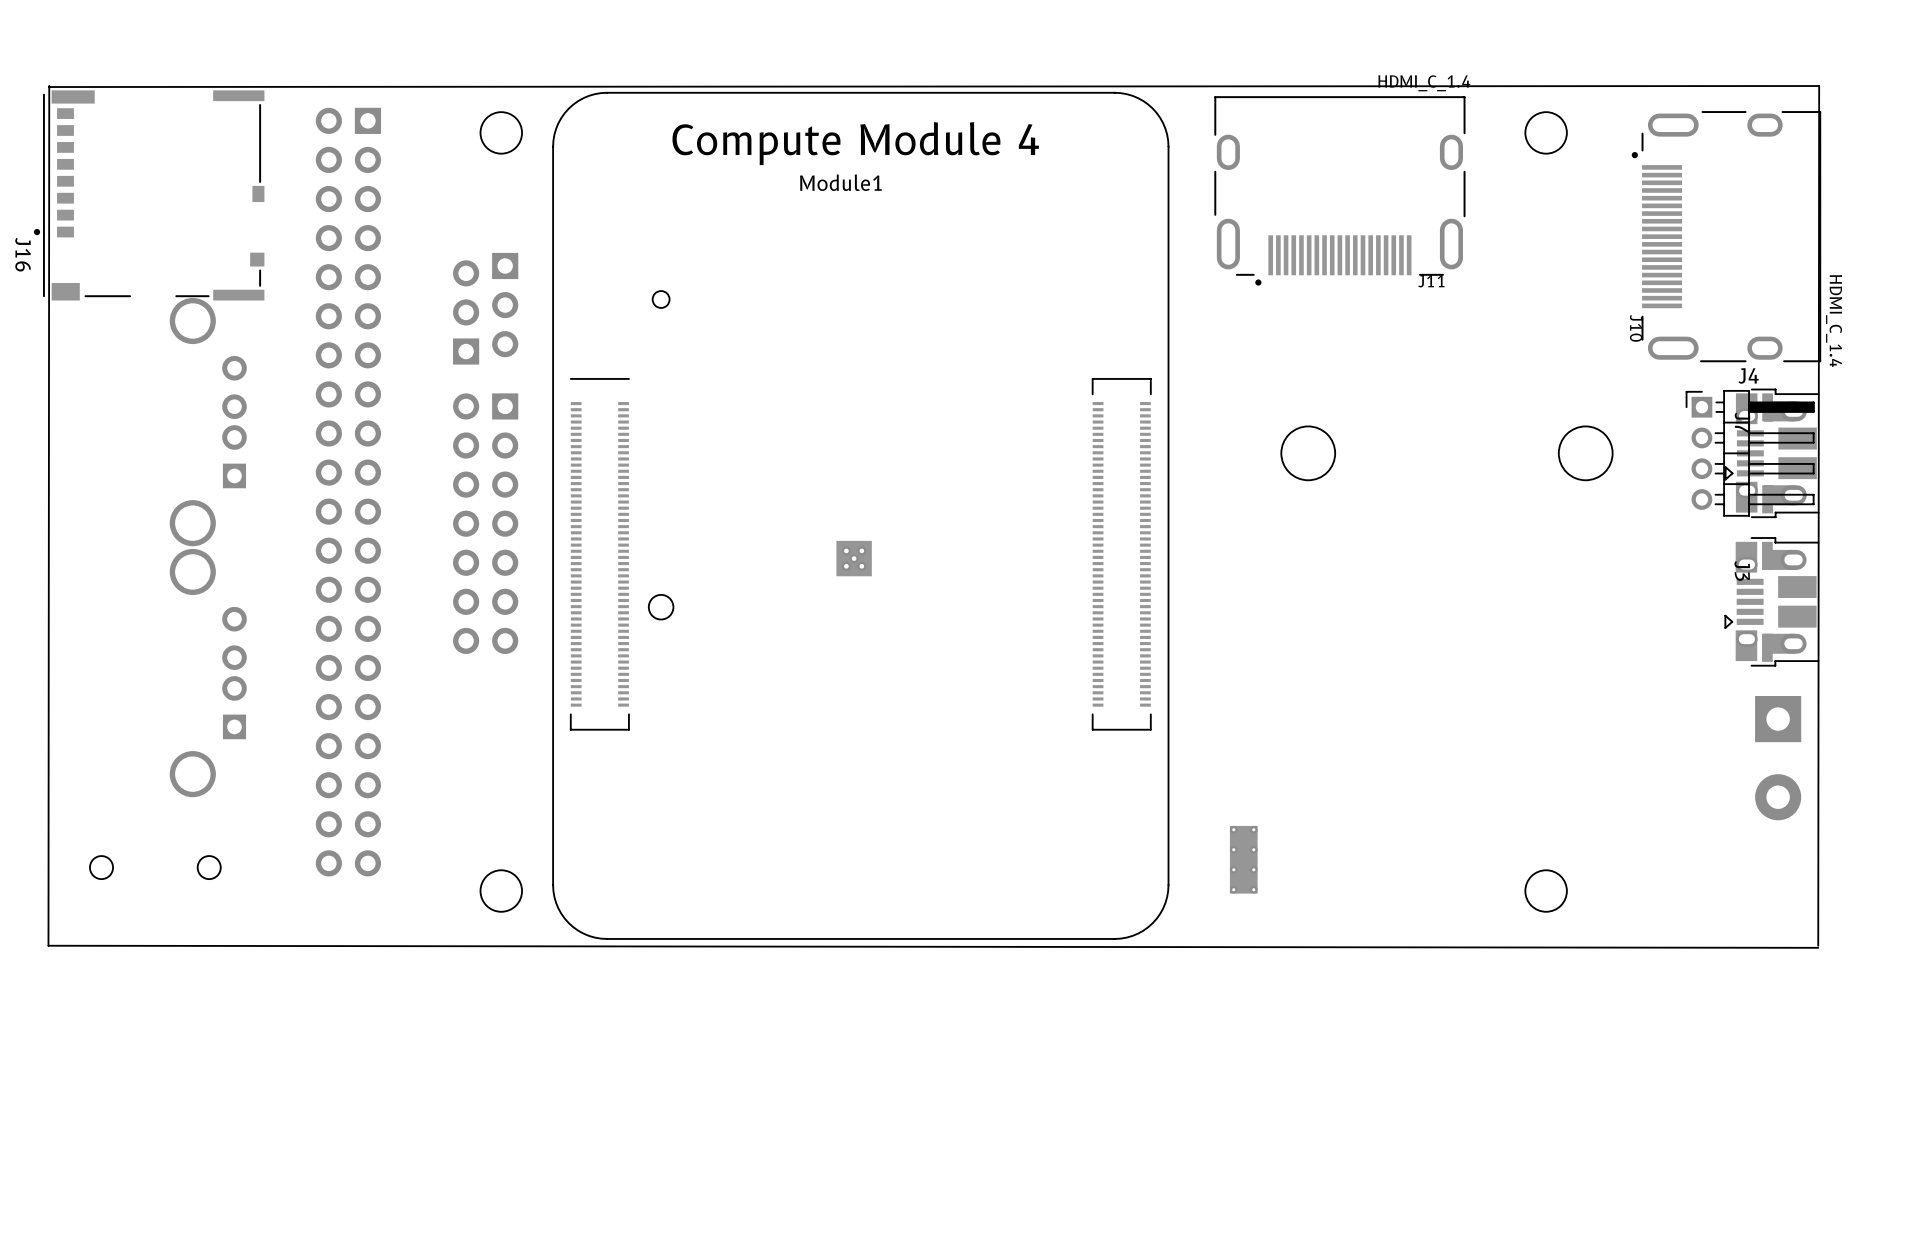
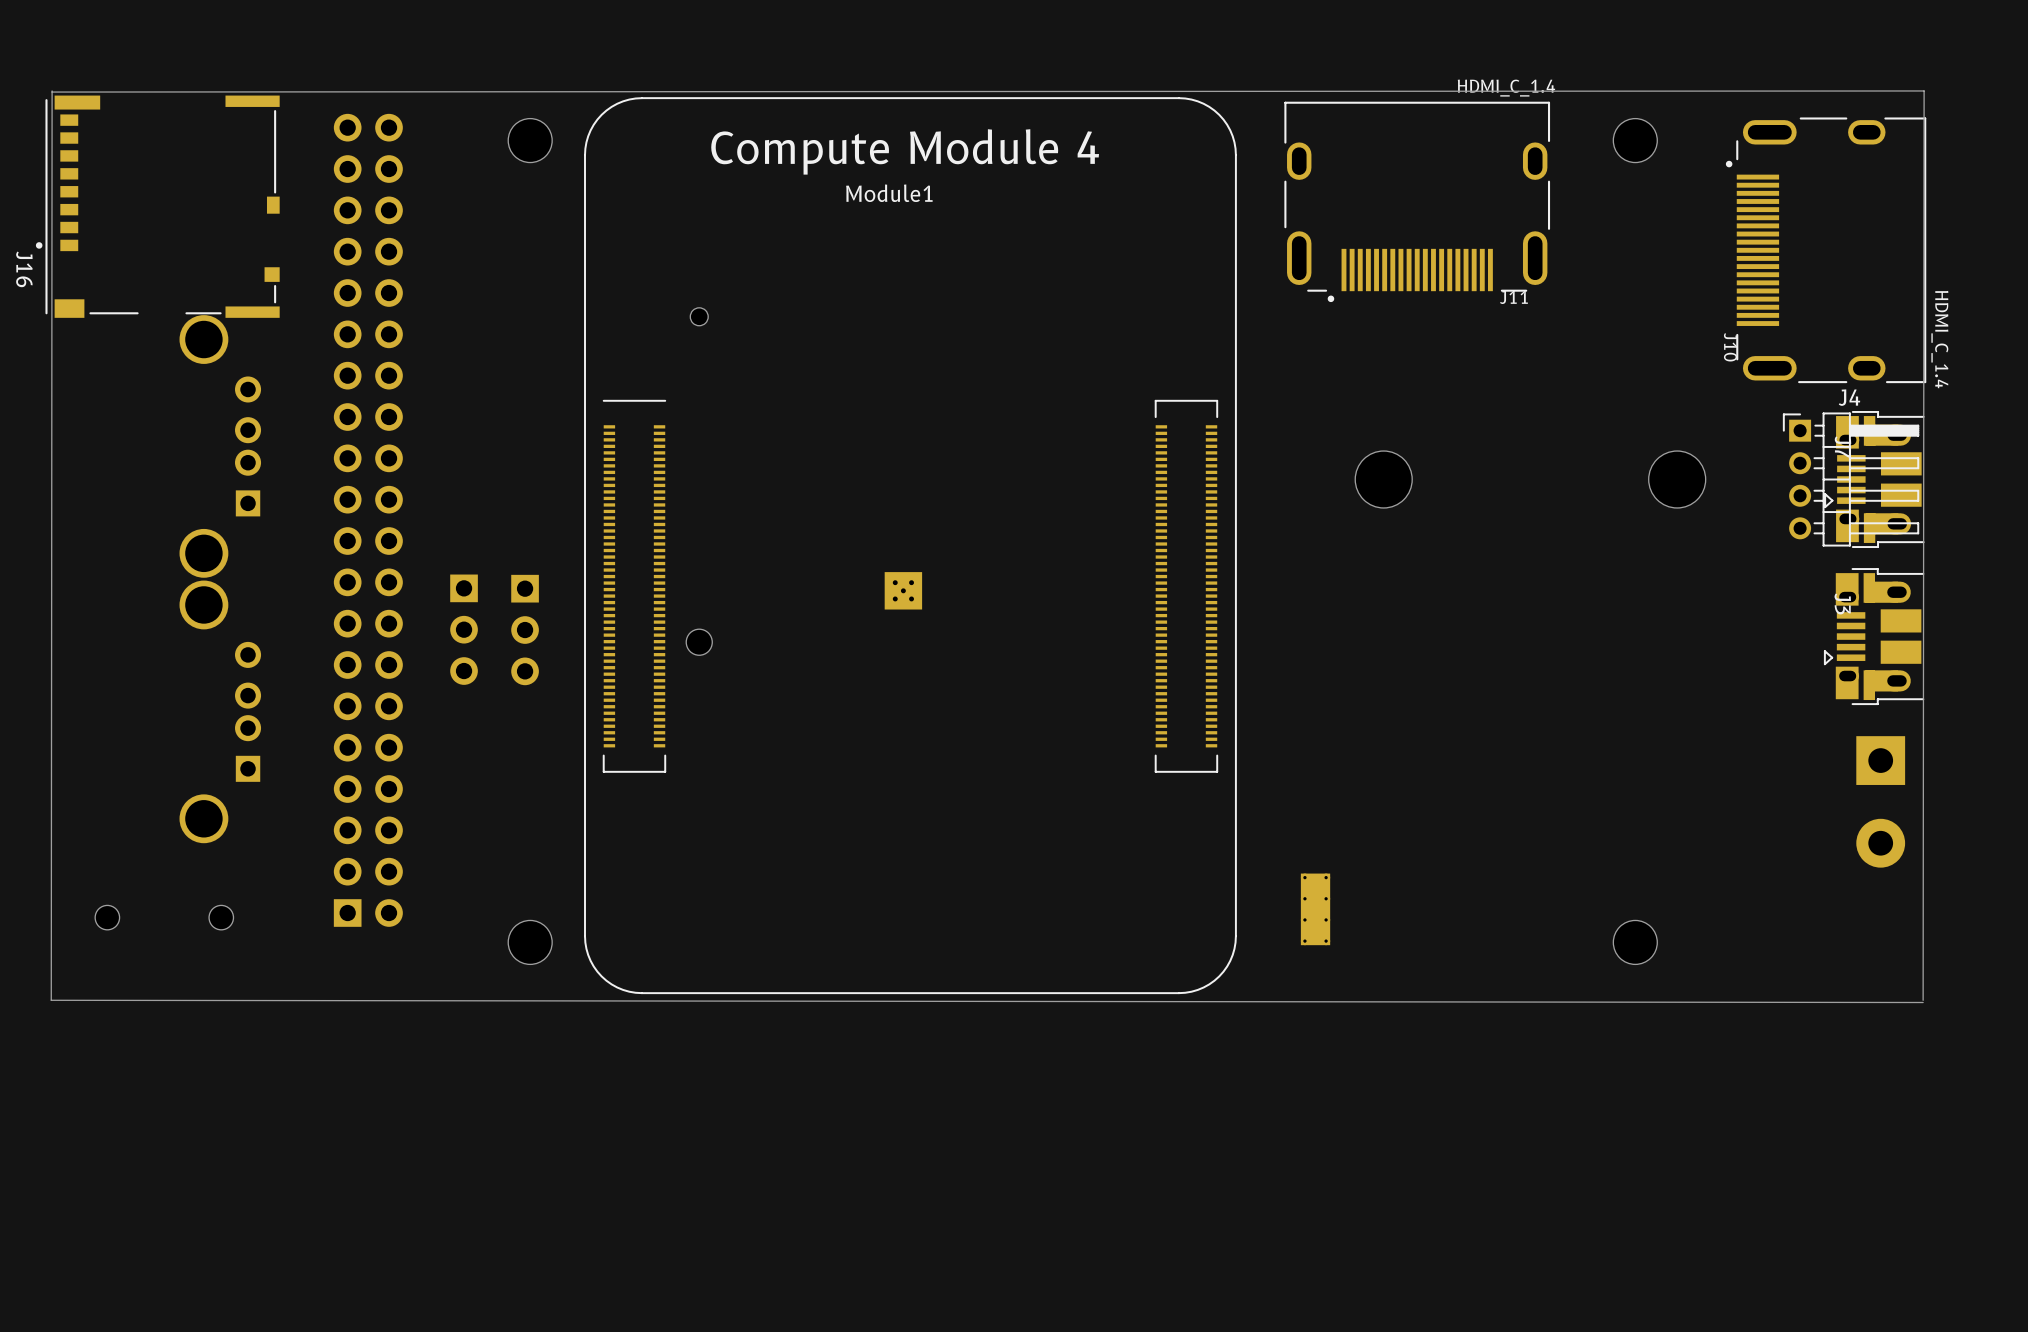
part: (505, 305) -> none
part: (466, 312) -> none
part rotation: 0° (348, 492) -> 180° (368, 520)
part: (485, 523) -> none
part: none -> (464, 629)
part: none -> (525, 630)

